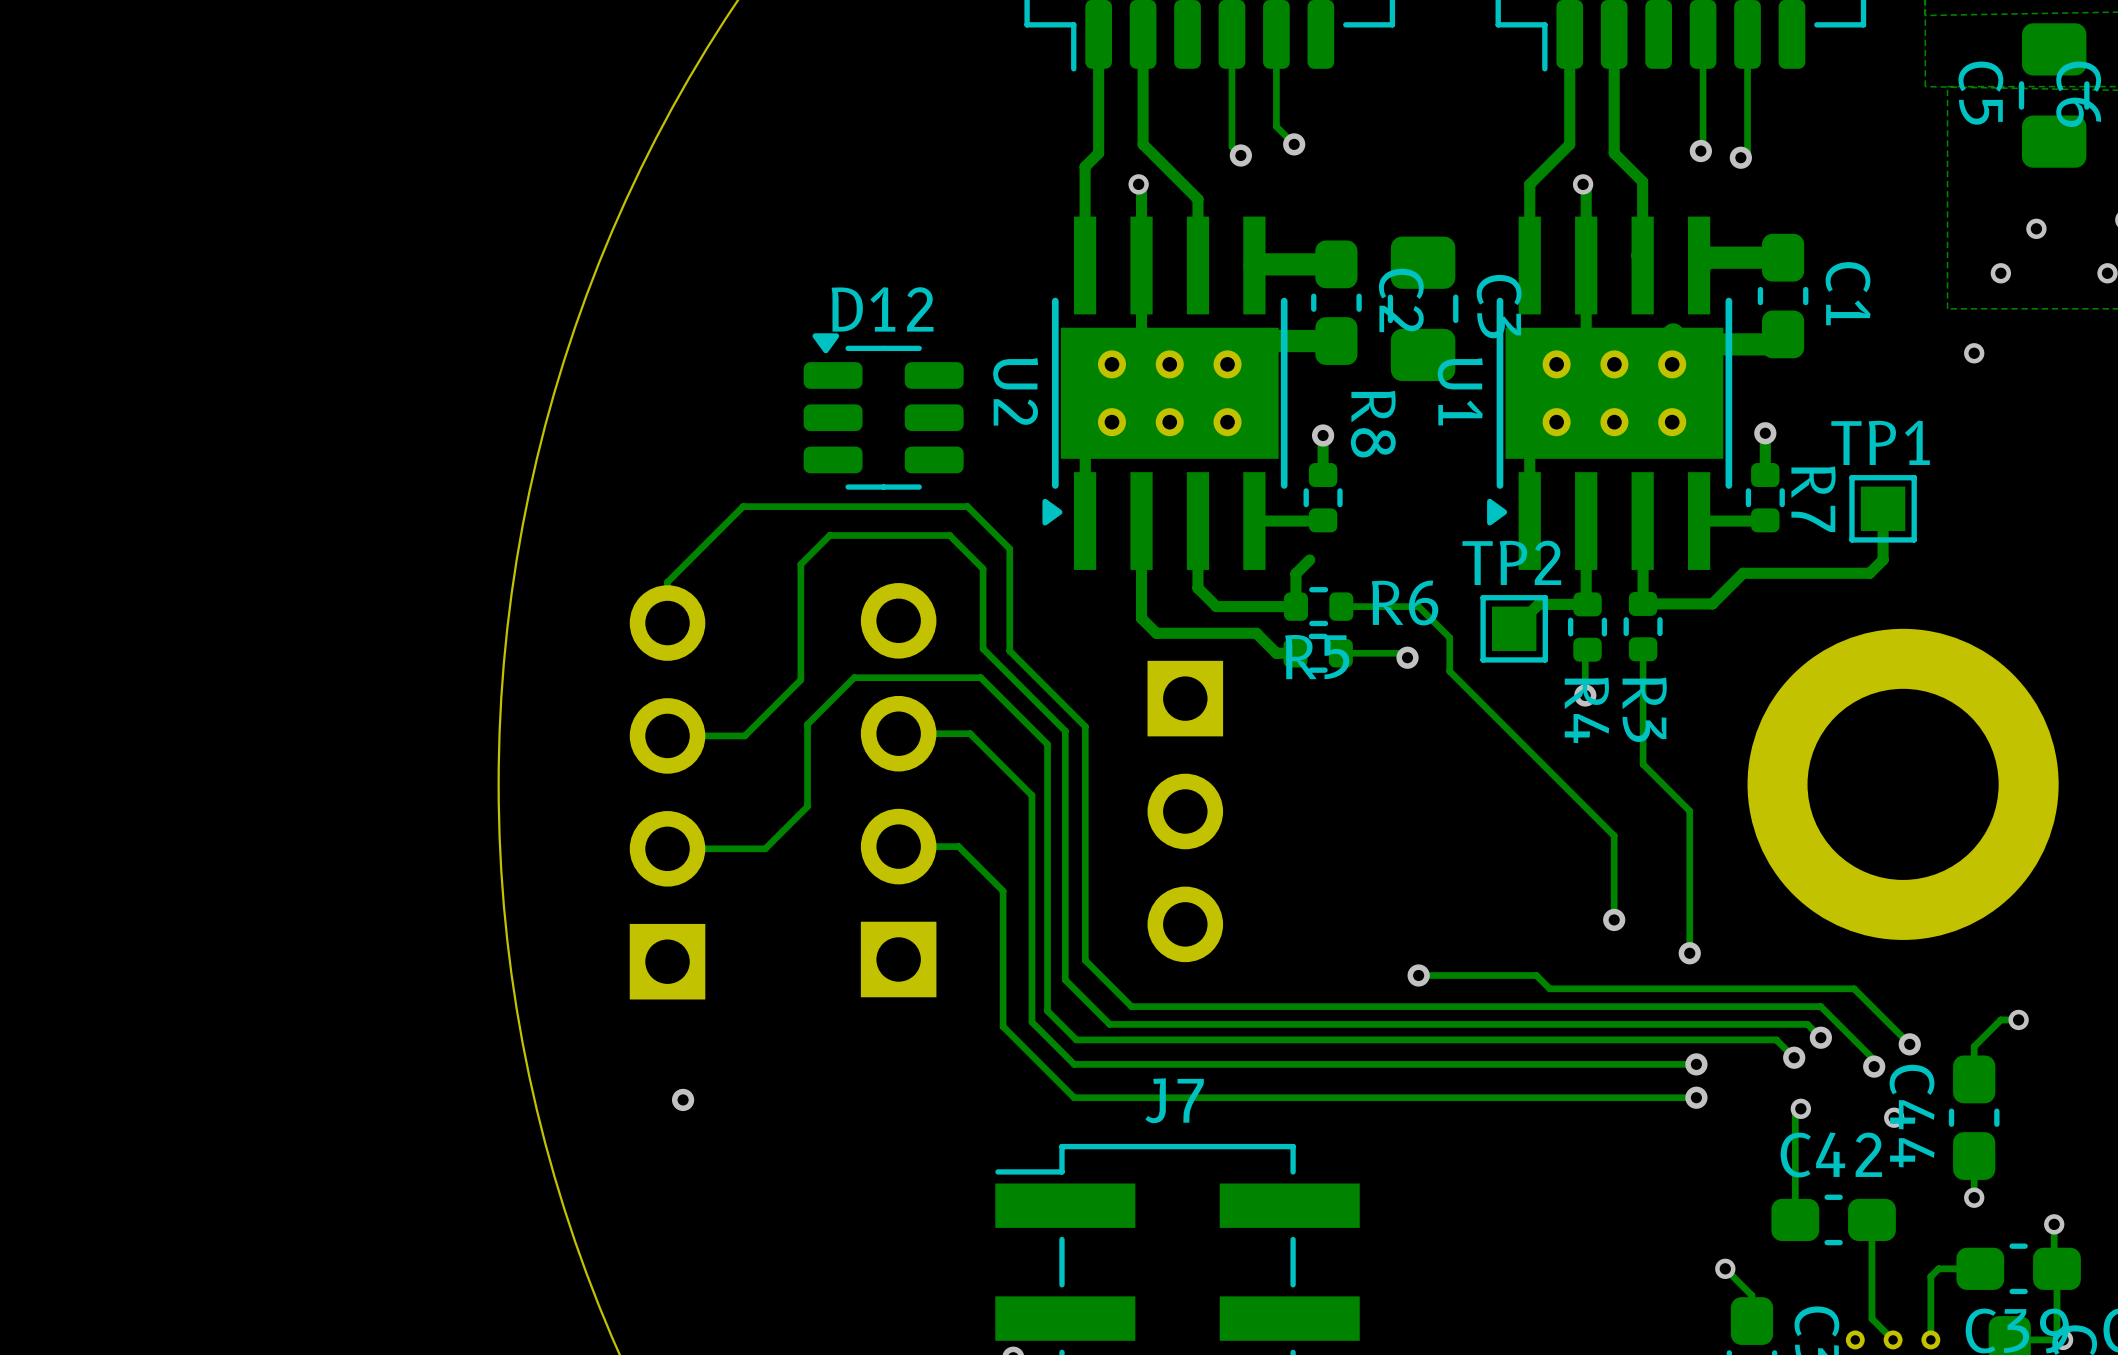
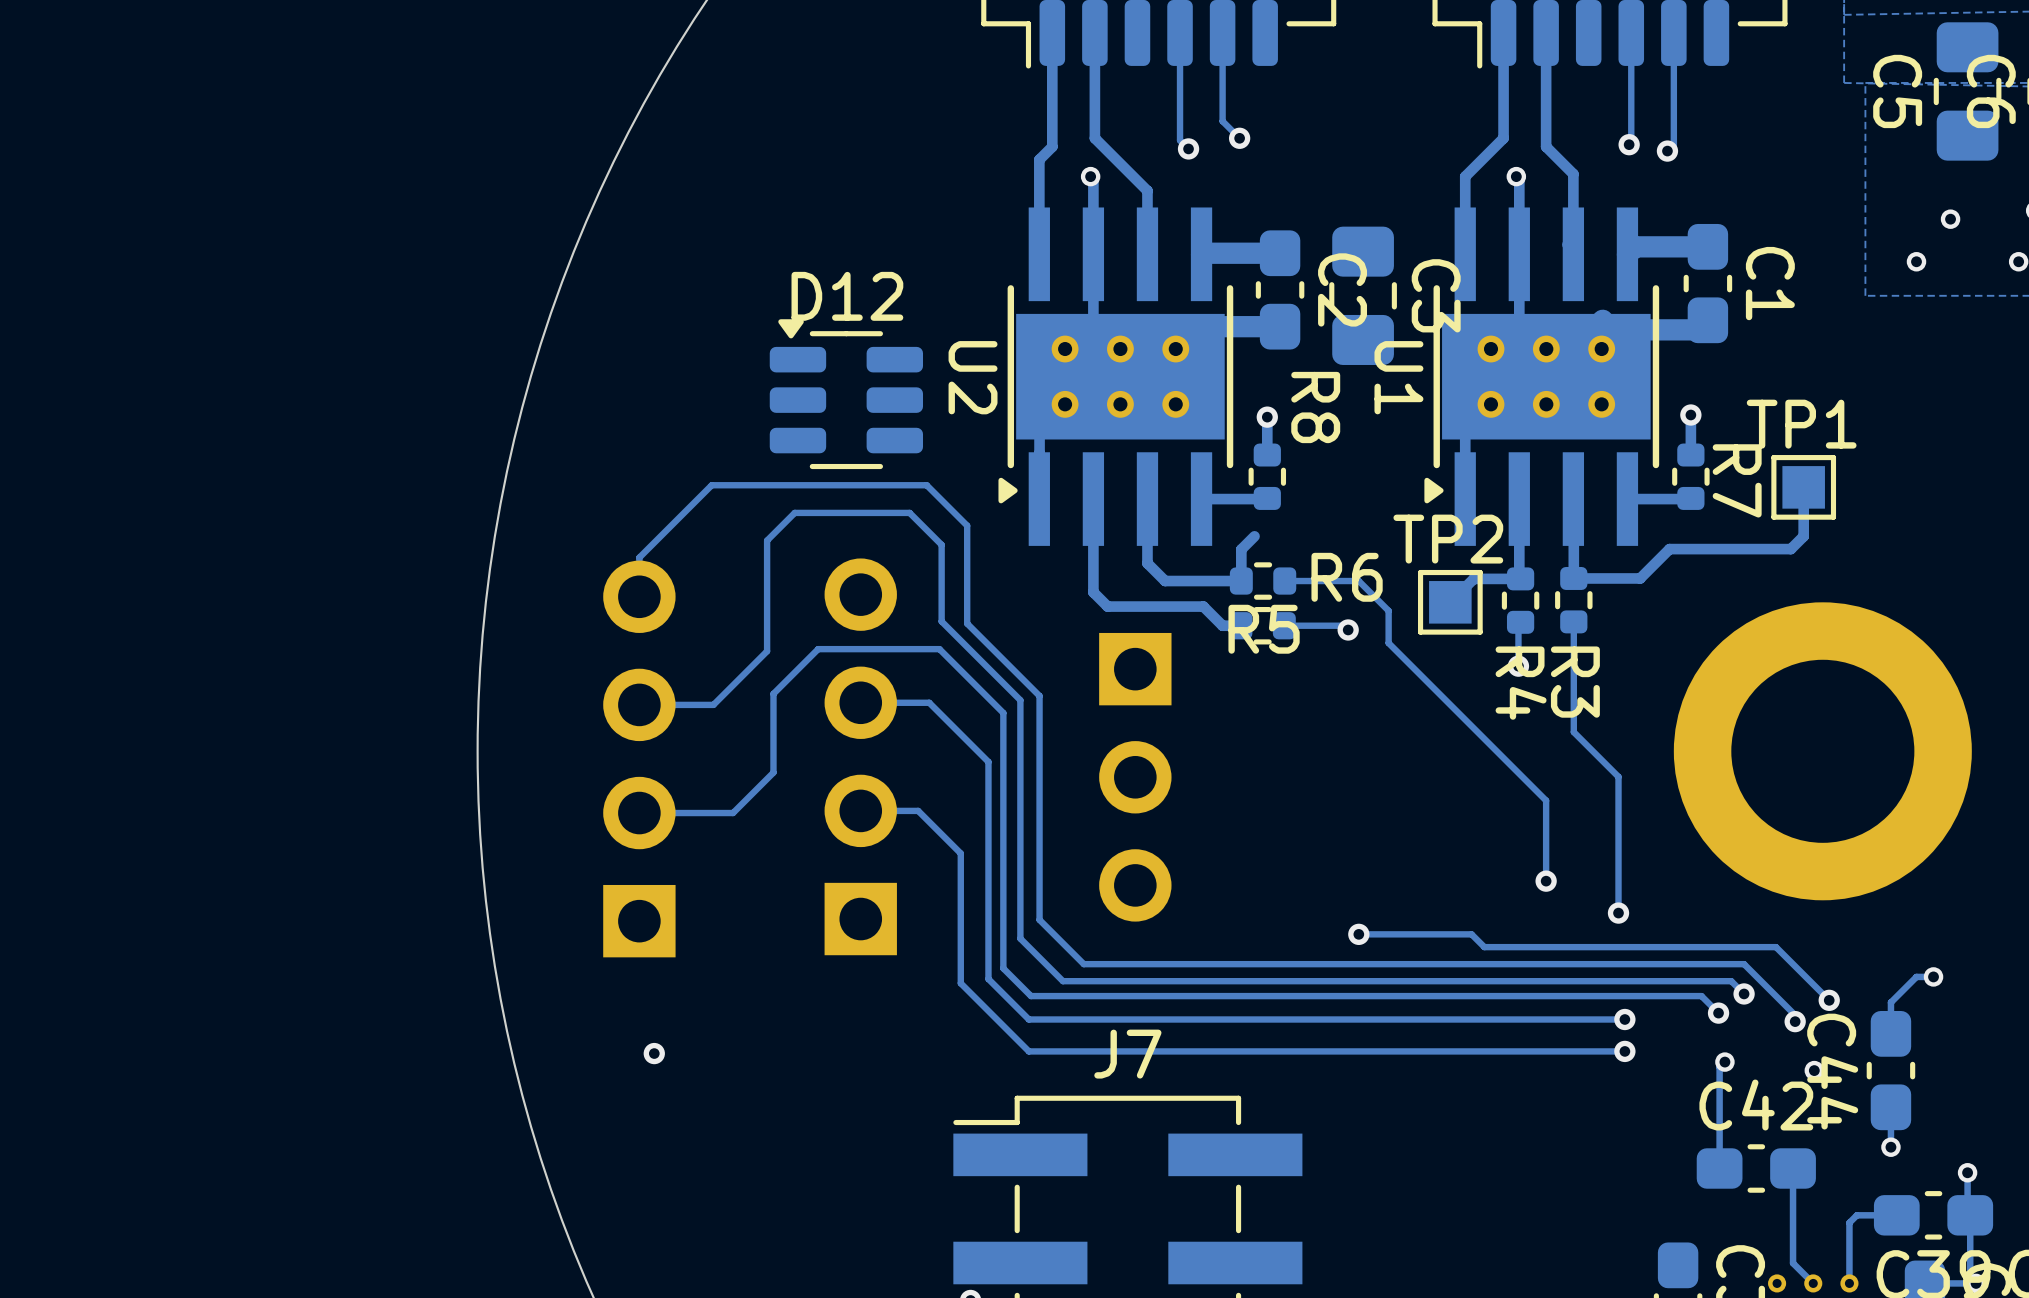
via: (1974, 353) -> none
track: (1725, 1268) (1751, 1295) (1751, 1321) -> none
via: (1725, 1268) -> none

